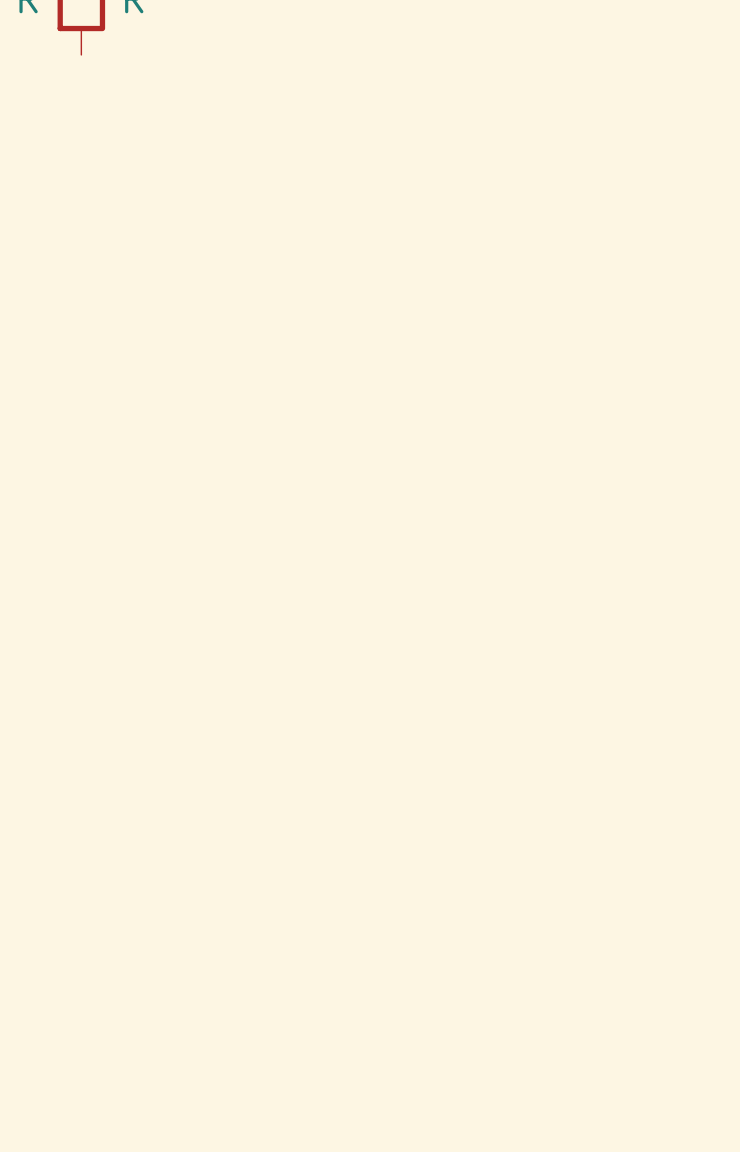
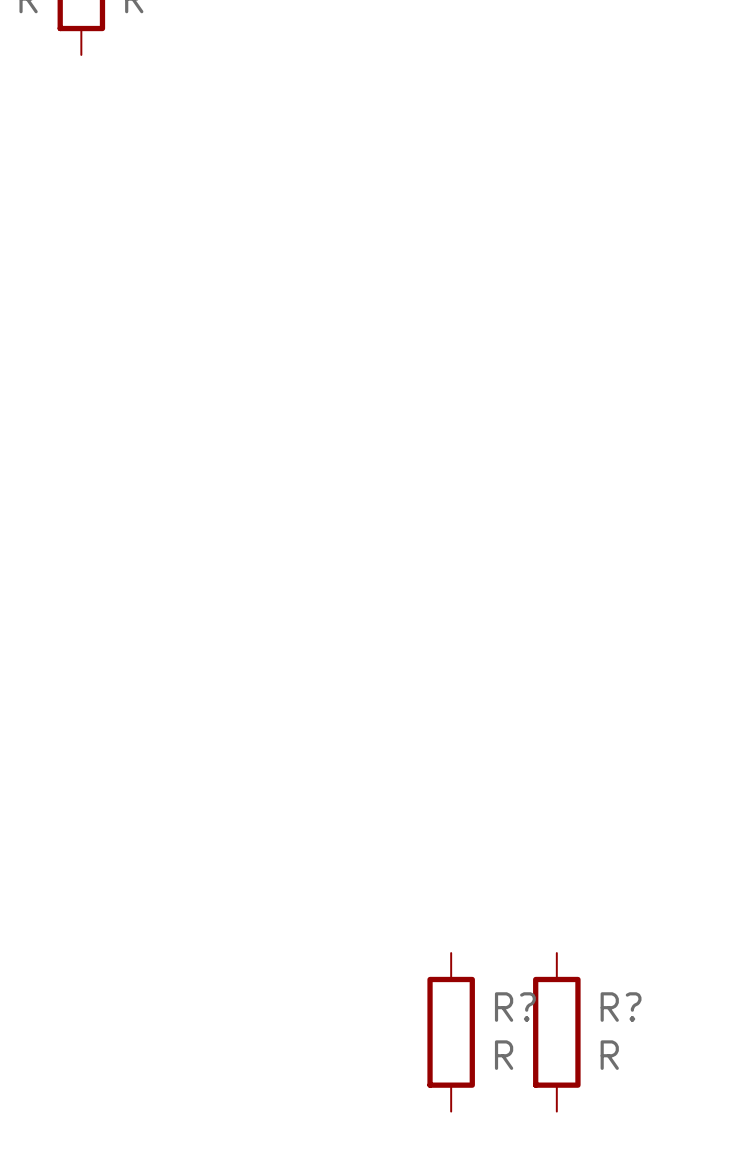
R?: none -> R (451, 1032)
R?: none -> R (556, 1032)

